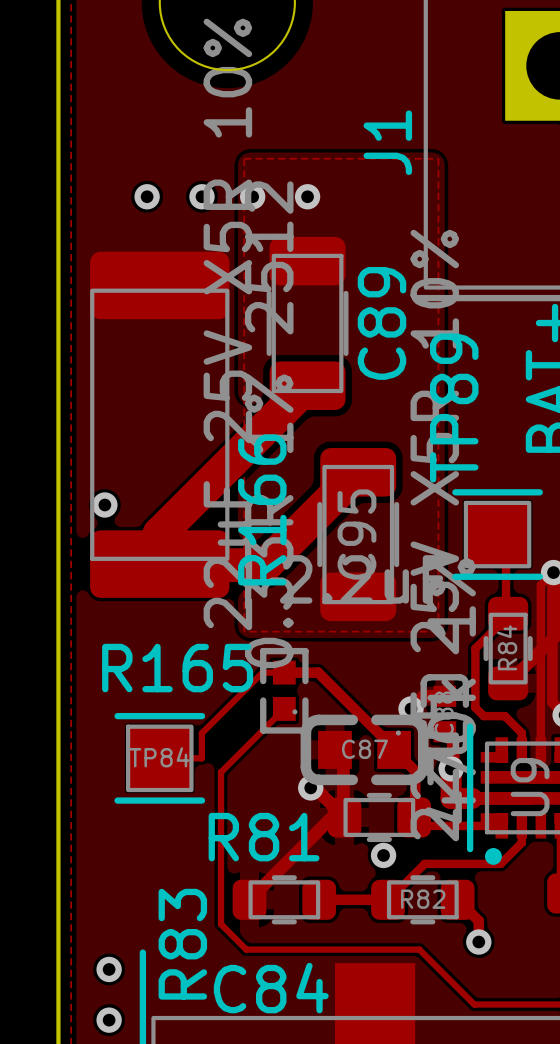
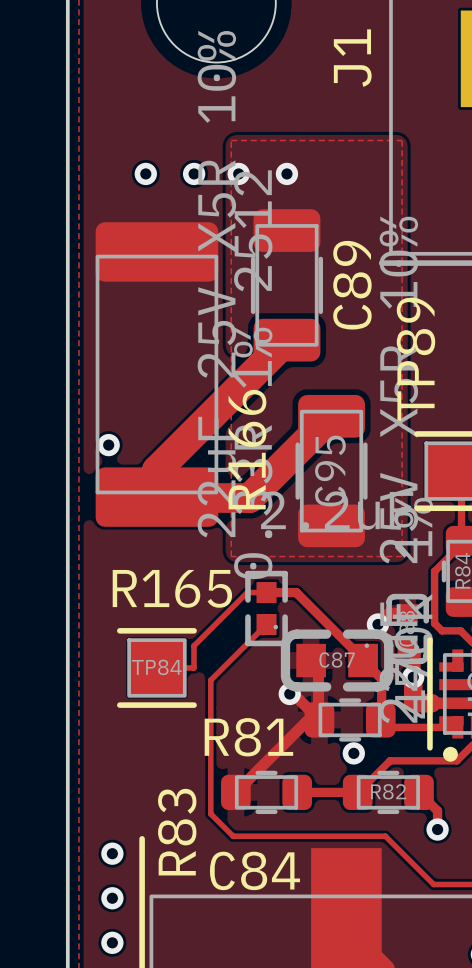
J1 name position: J1 (387, 142) -> J1 (352, 58)

